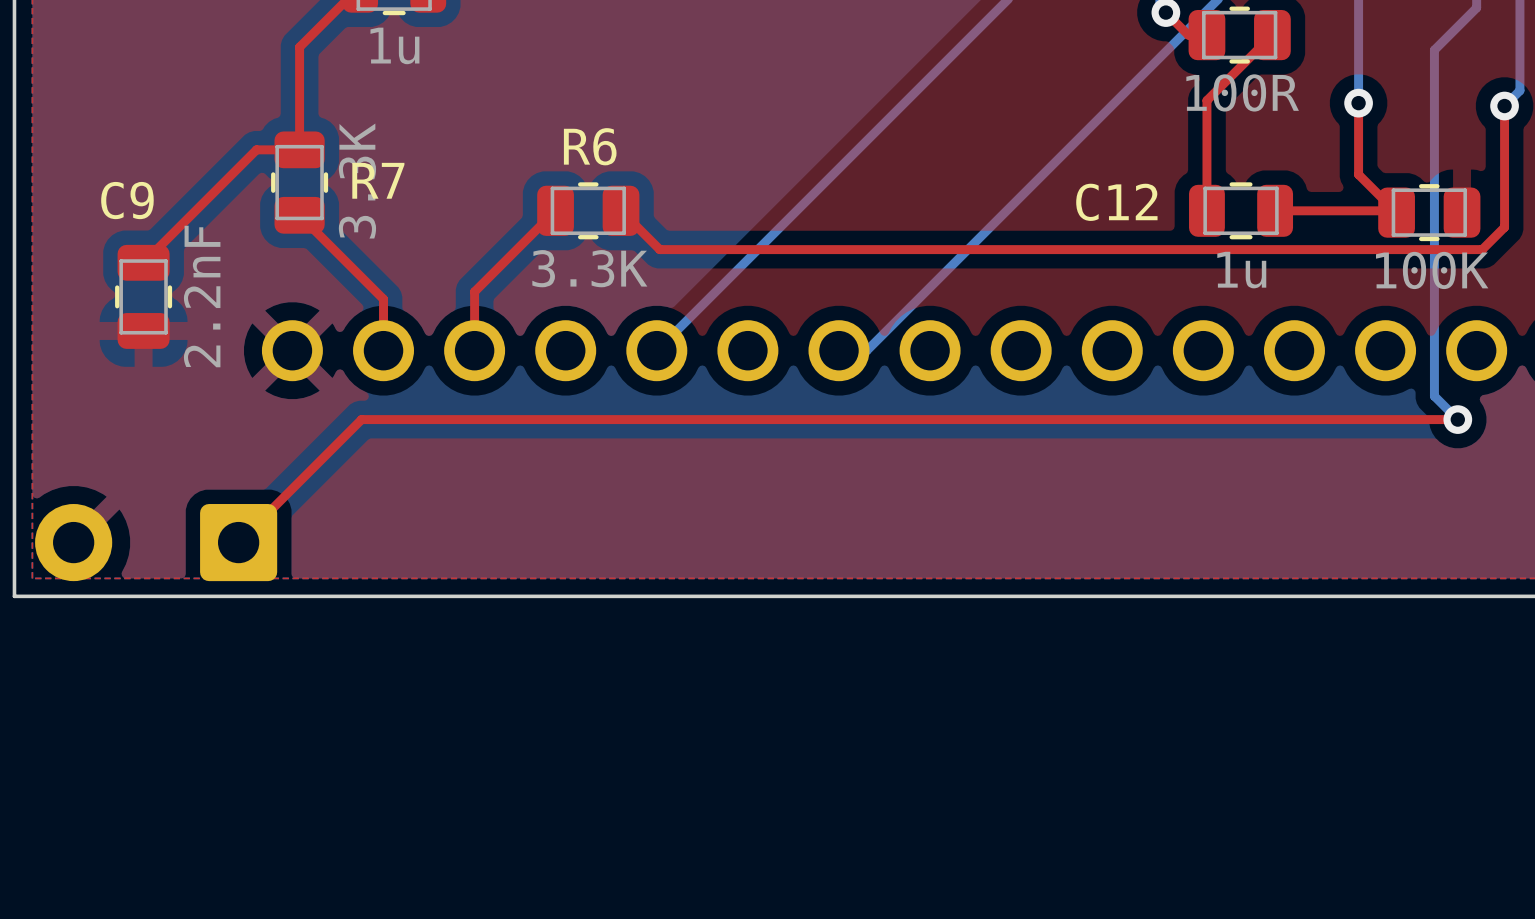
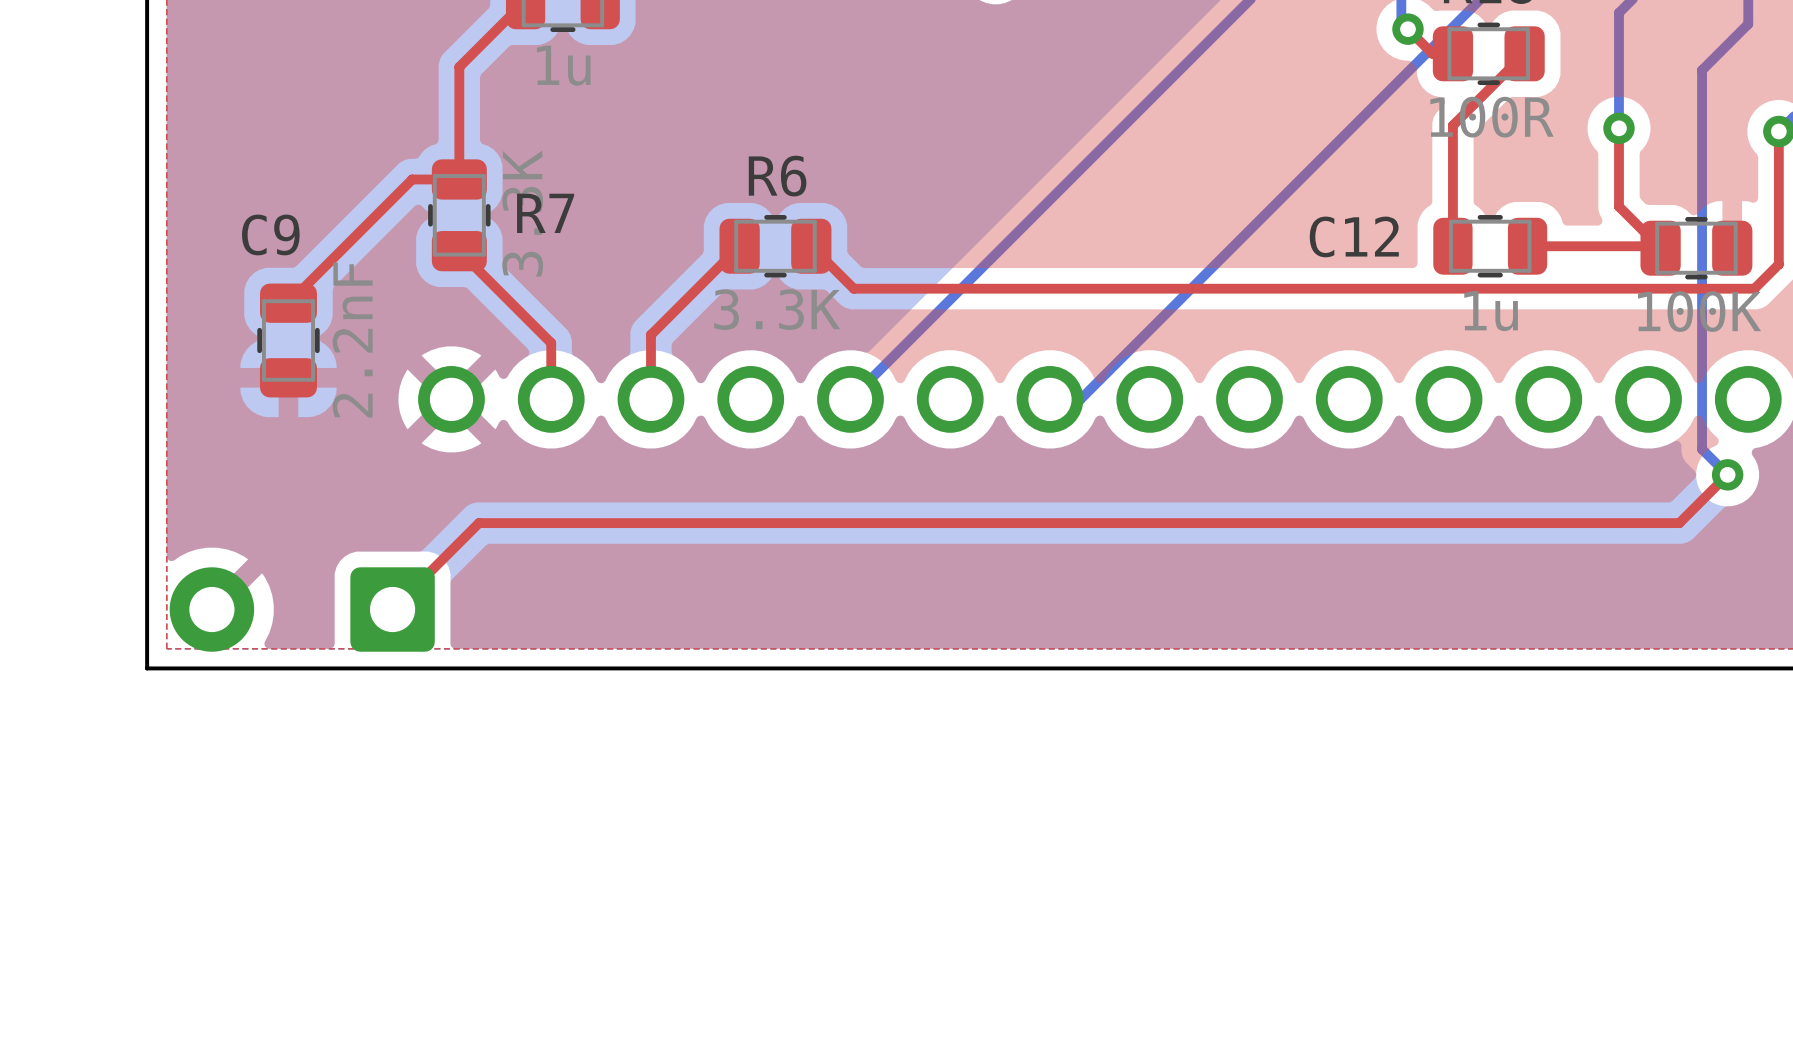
top track: (1457, 419) (361, 419) (317, 463) -> (1727, 474) (1679, 523) (478, 523)

